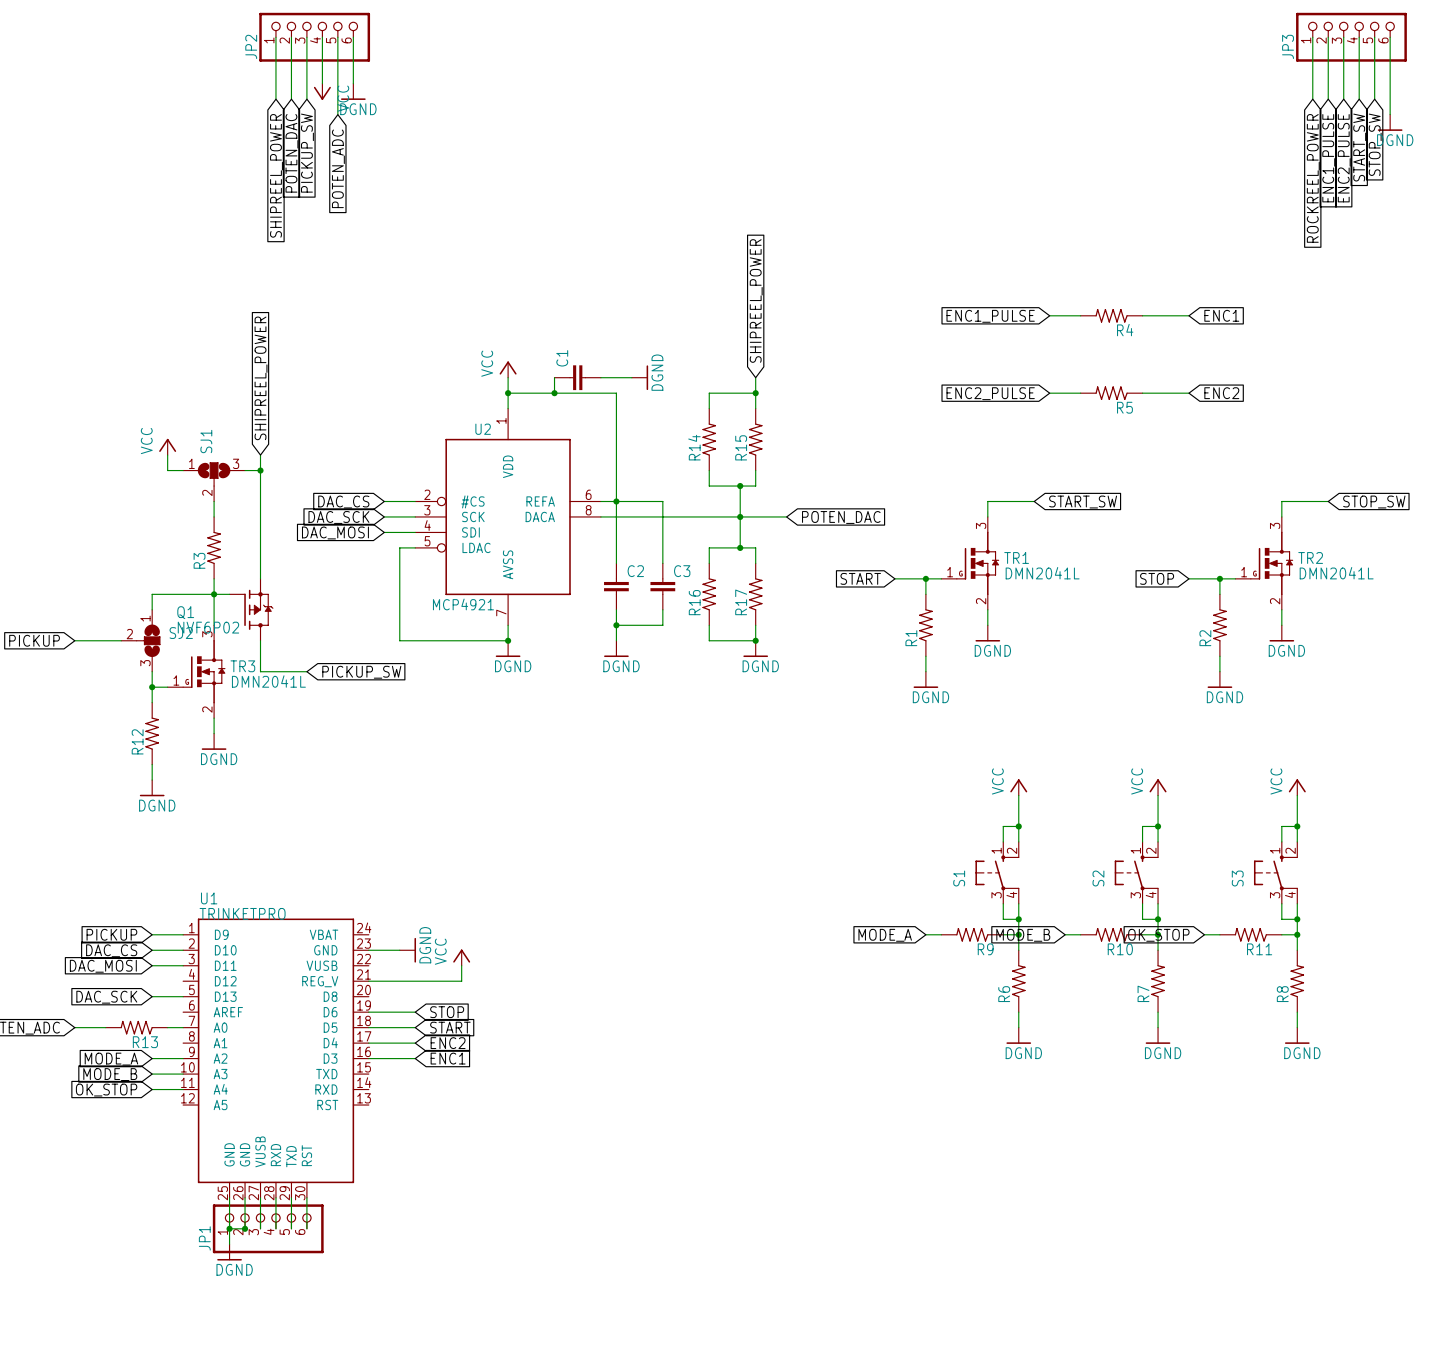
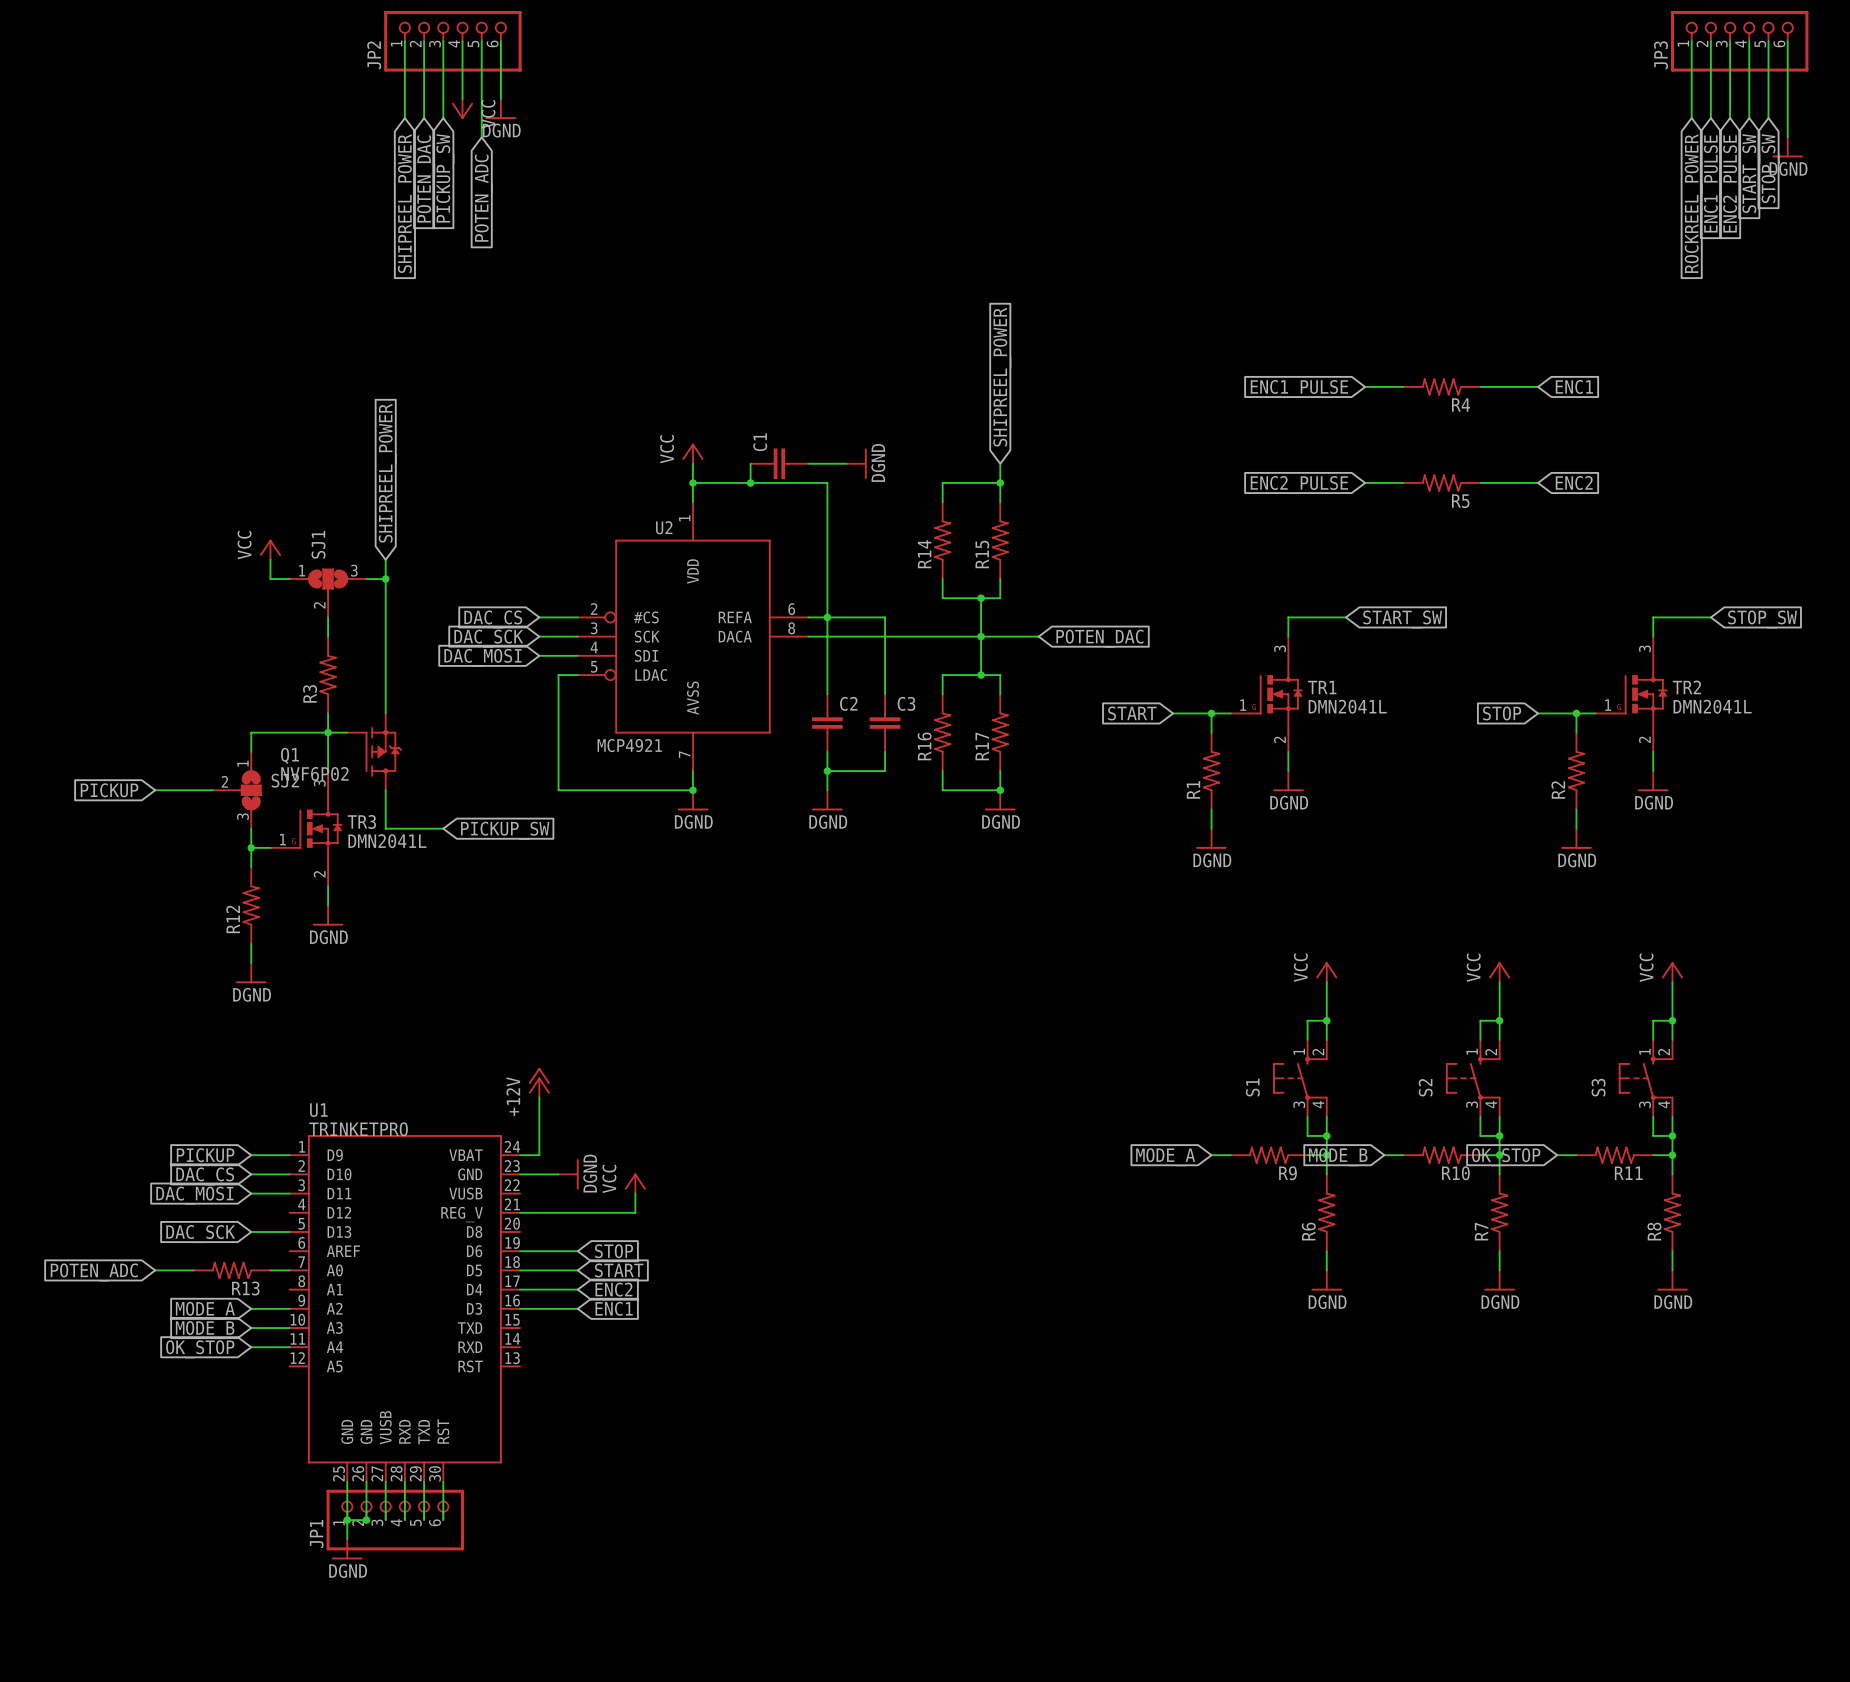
power symbol: none -> +12V (539, 1082)
wire: none -> (539, 1097) (539, 1155) (520, 1155)

